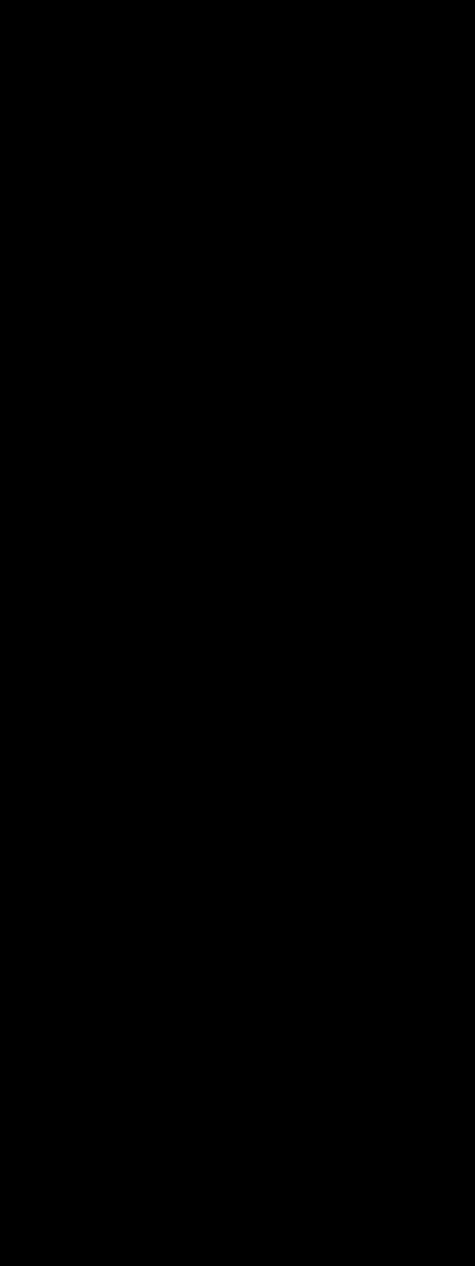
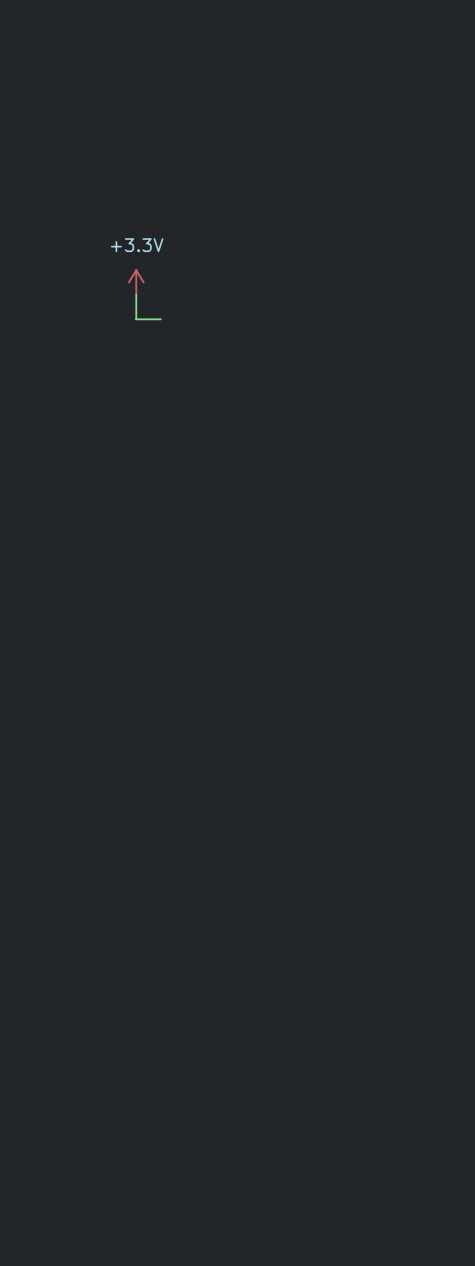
power symbol: none -> +3.3V (136, 282)
wire: none -> (136, 294) (136, 319) (160, 319)

